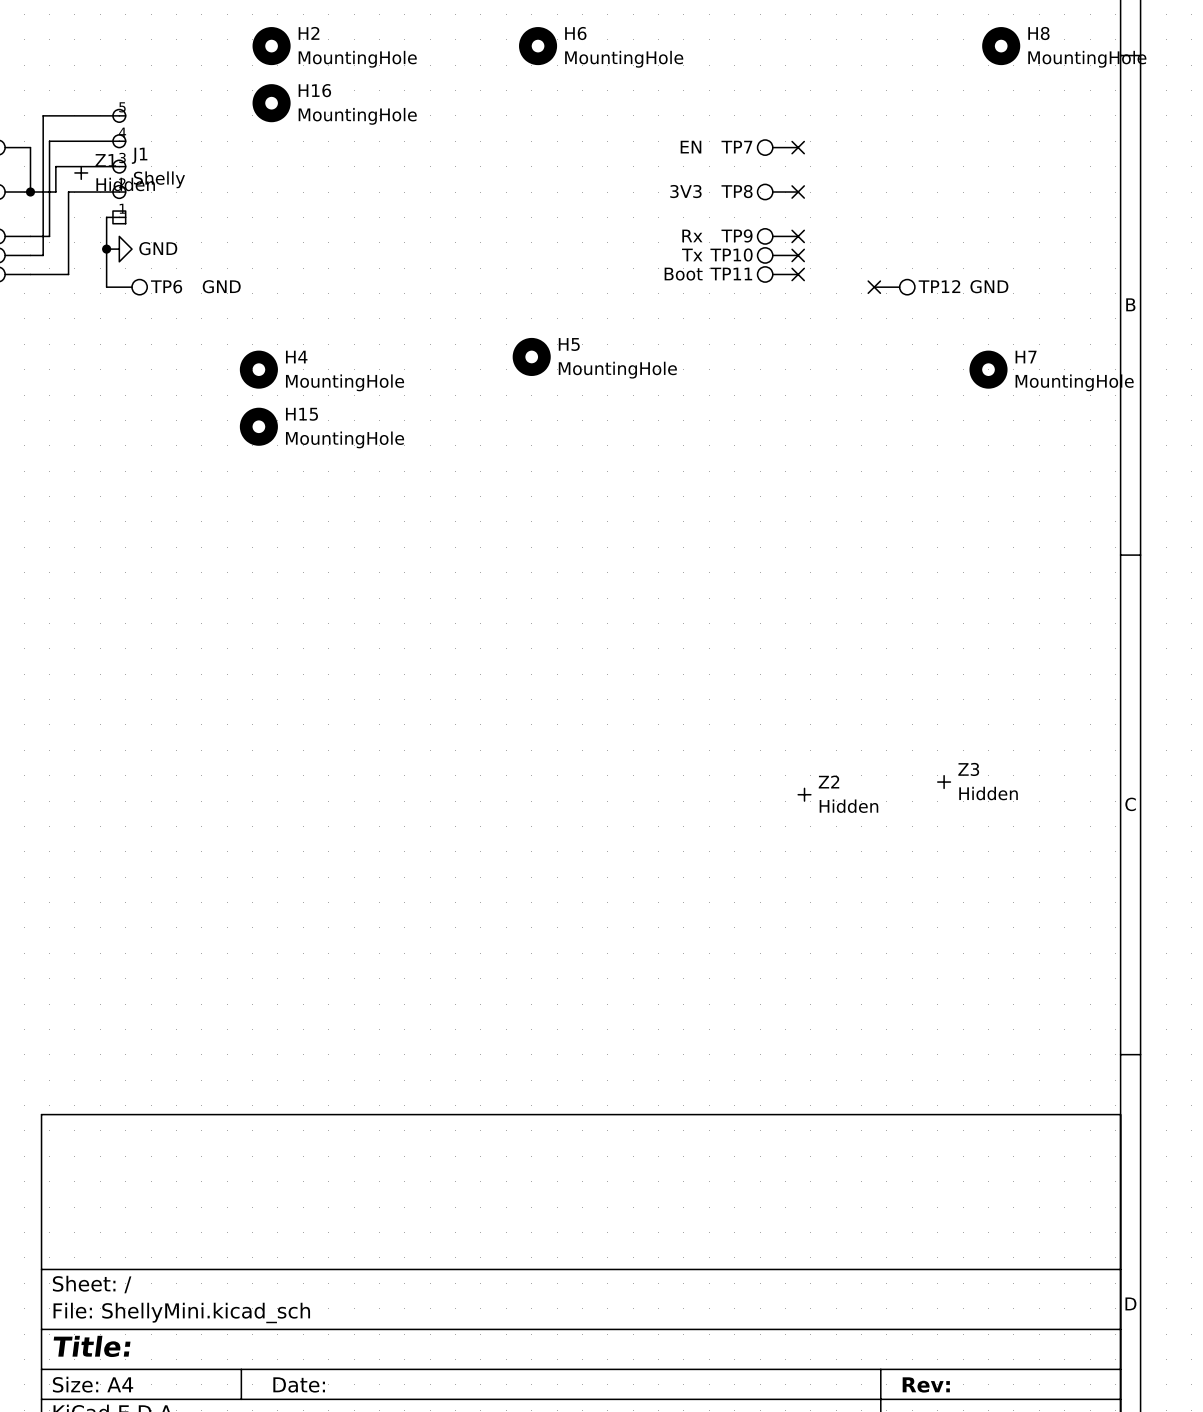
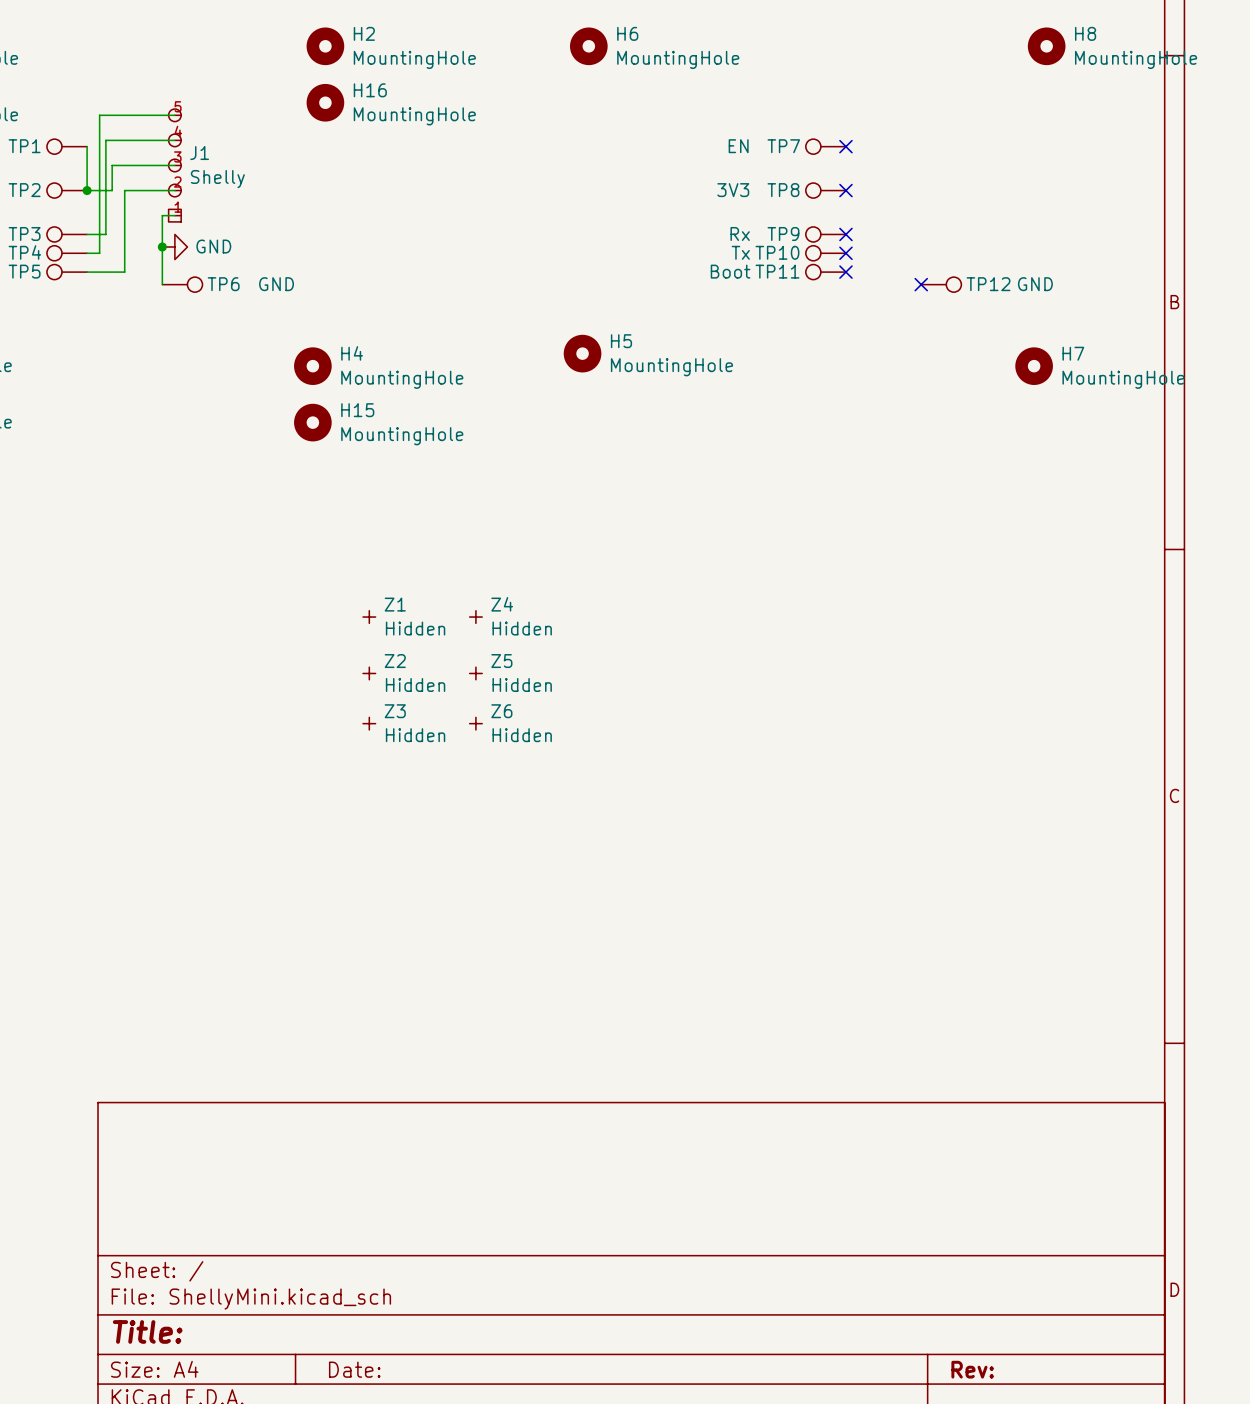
Z1 position: (81, 172) -> (369, 617)
Z4: none -> Hidden (475, 617)
Z5: none -> Hidden (475, 673)
Z6: none -> Hidden (475, 723)
Z3 position: (944, 782) -> (369, 723)
Z2 position: (804, 794) -> (369, 673)

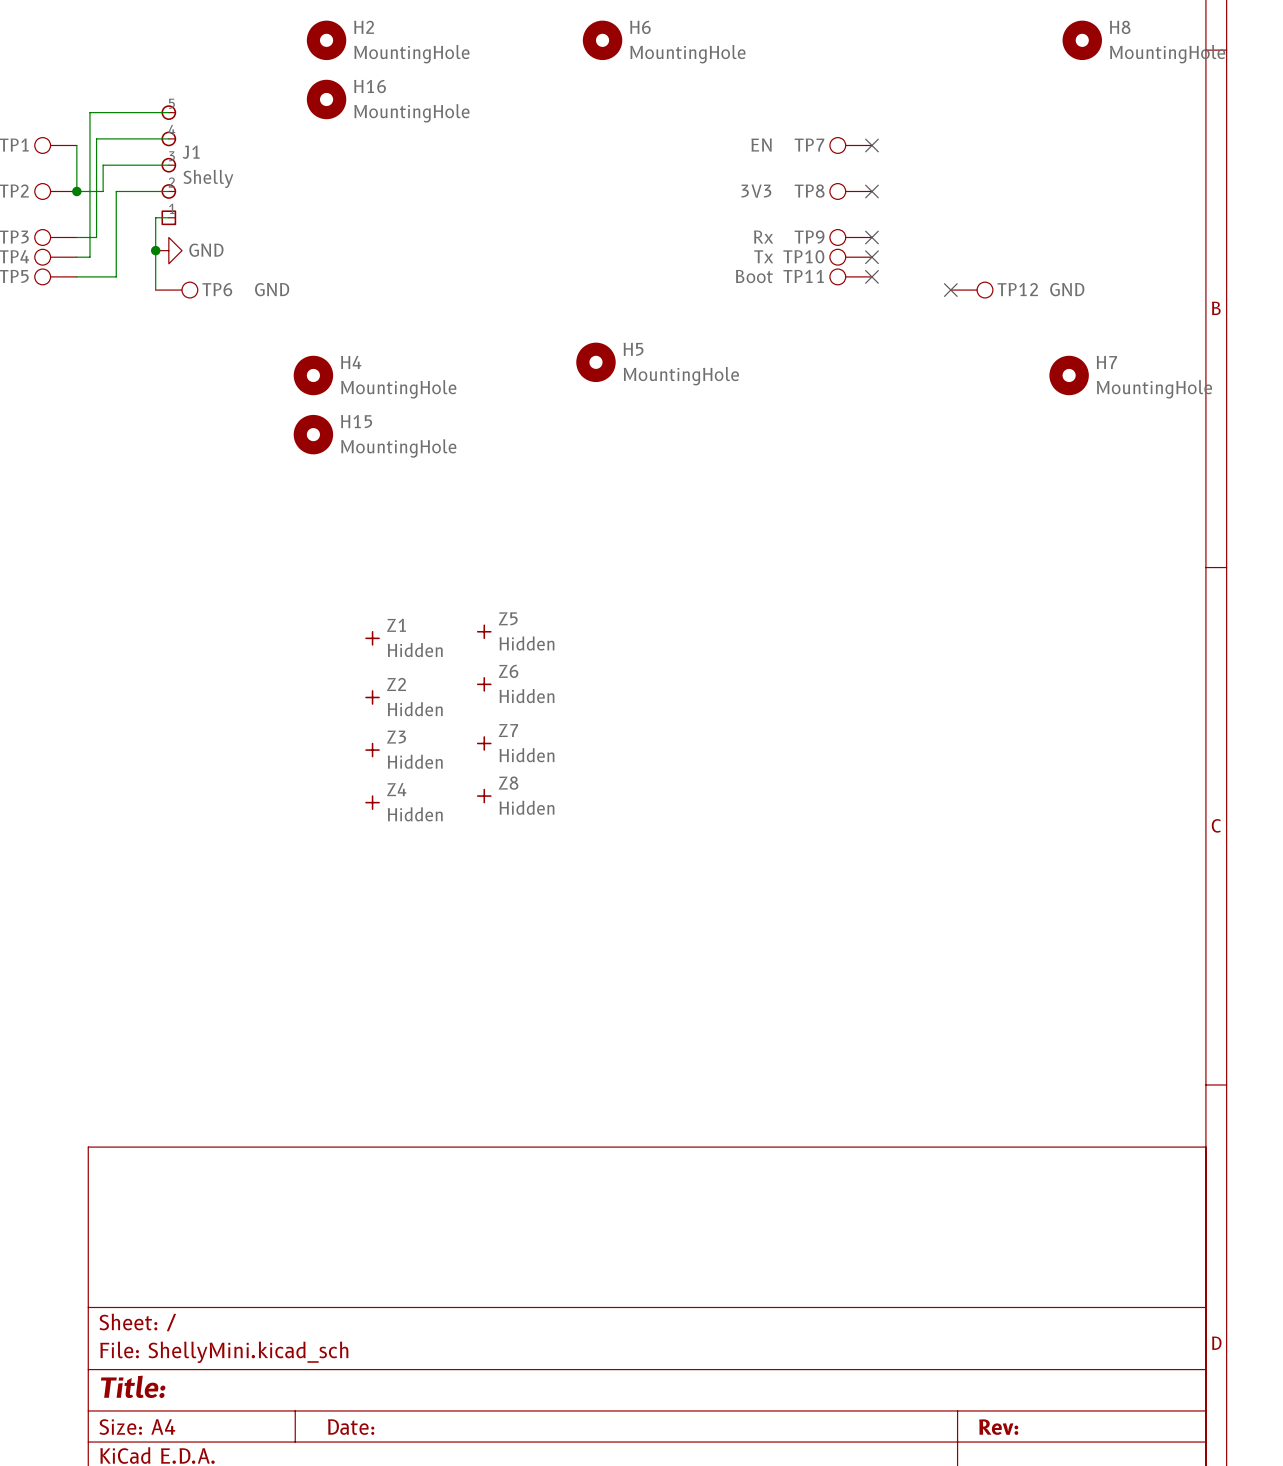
Z4 position: (475, 617) -> (372, 802)
Z5 position: (475, 673) -> (484, 631)
Z7: none -> Hidden (484, 743)
Z6 position: (475, 723) -> (484, 684)
Z8: none -> Hidden (484, 796)

